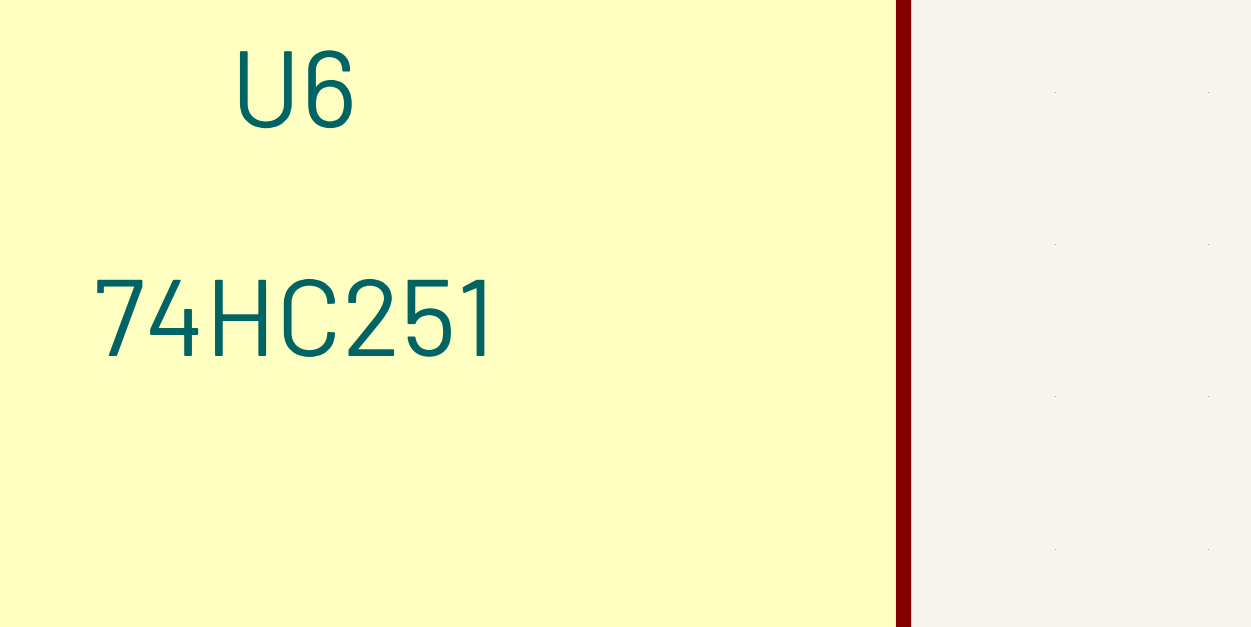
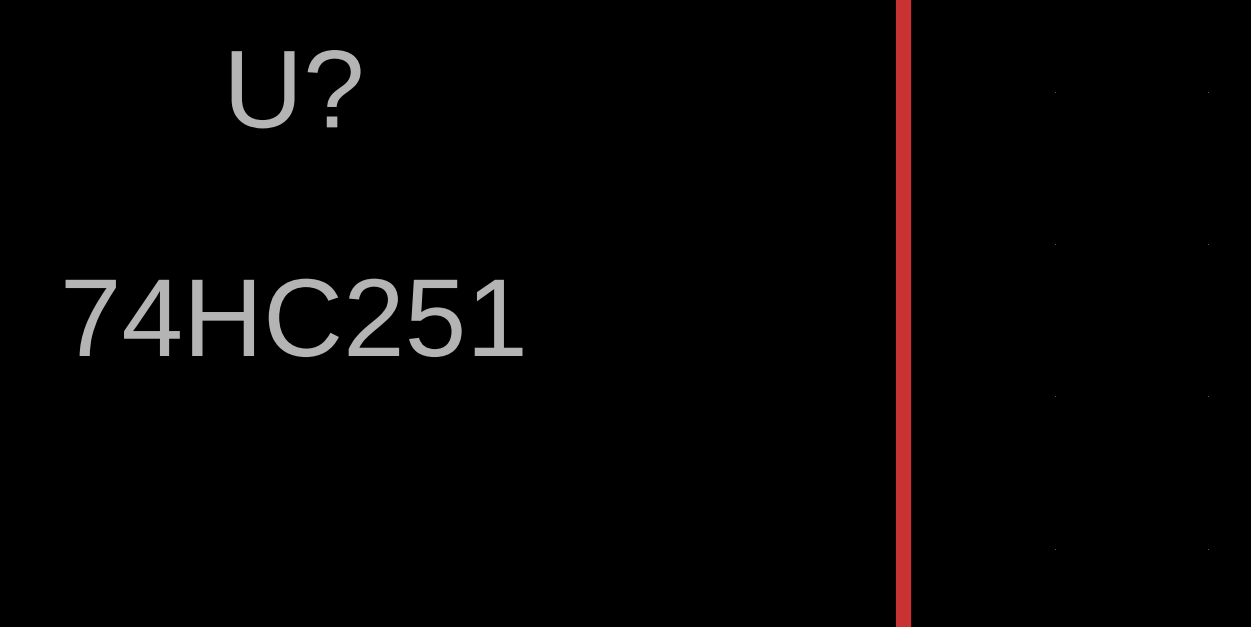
U6 name: U6 (295, 89) -> U? (296, 89)

